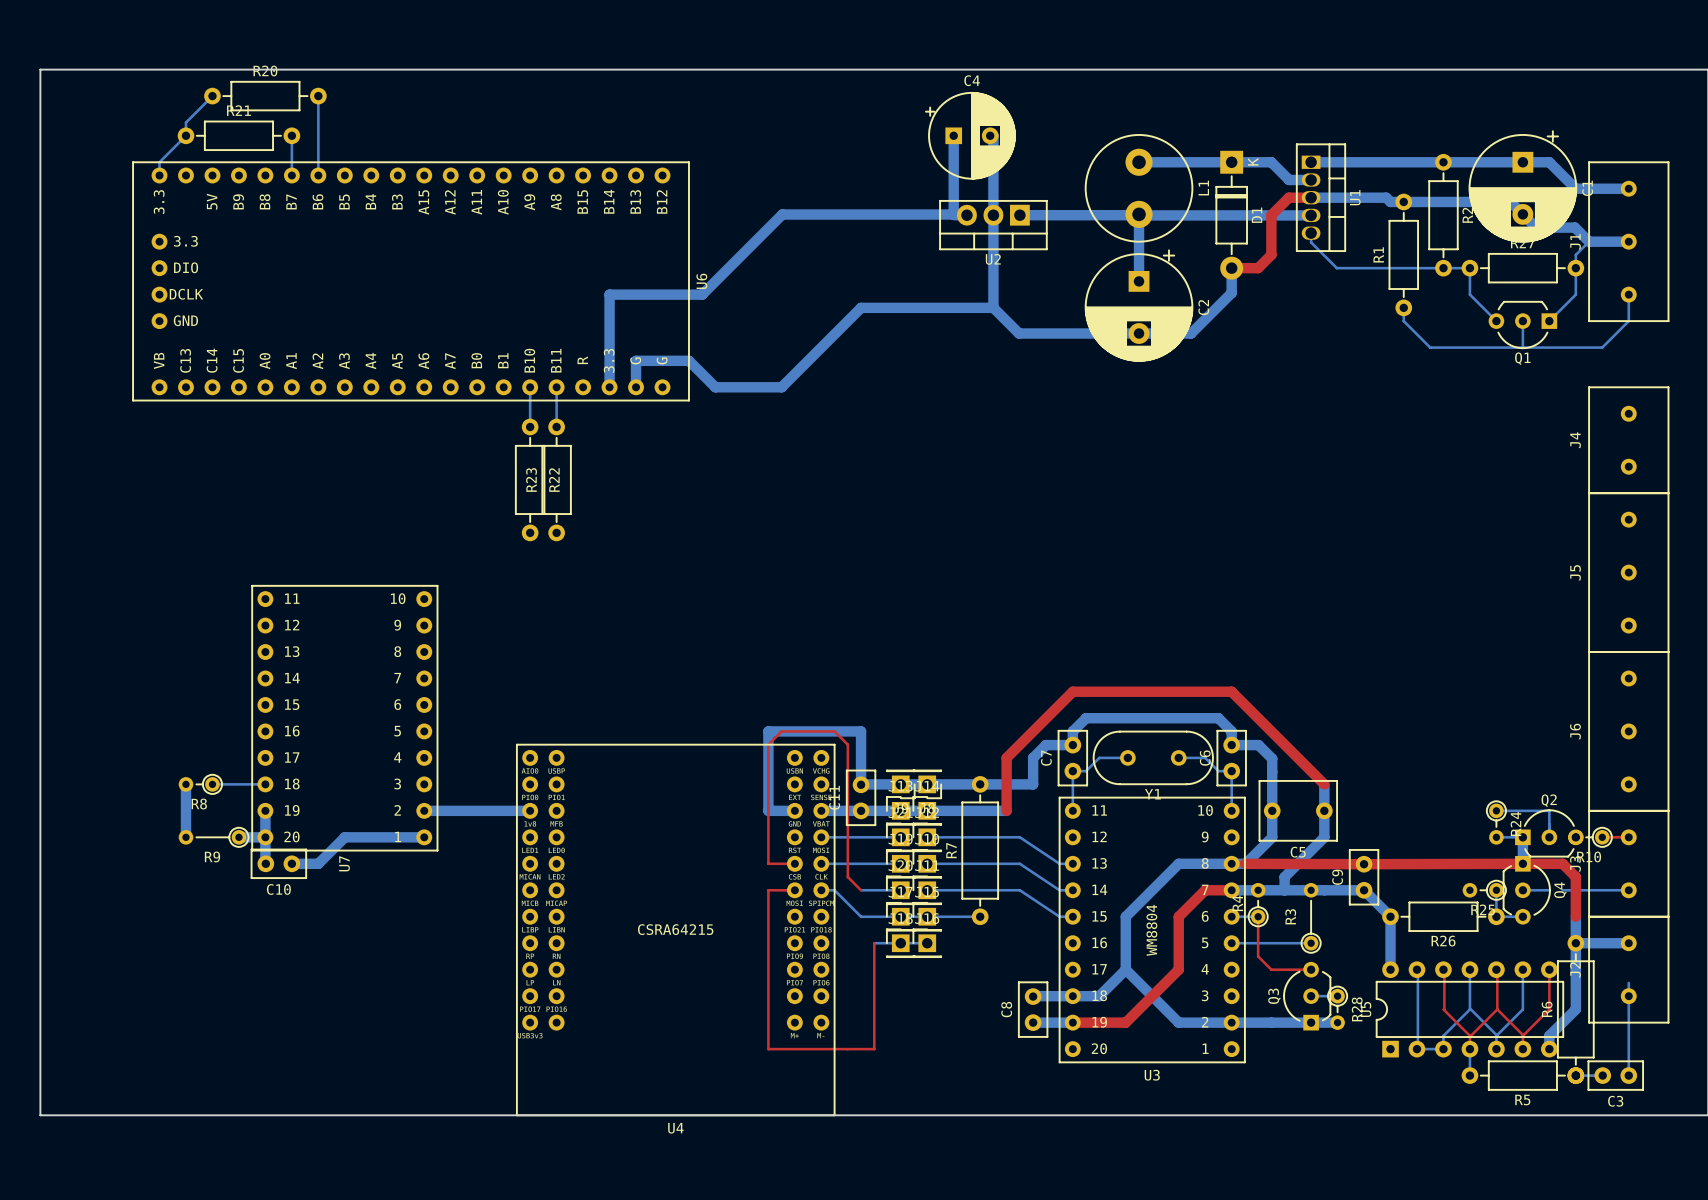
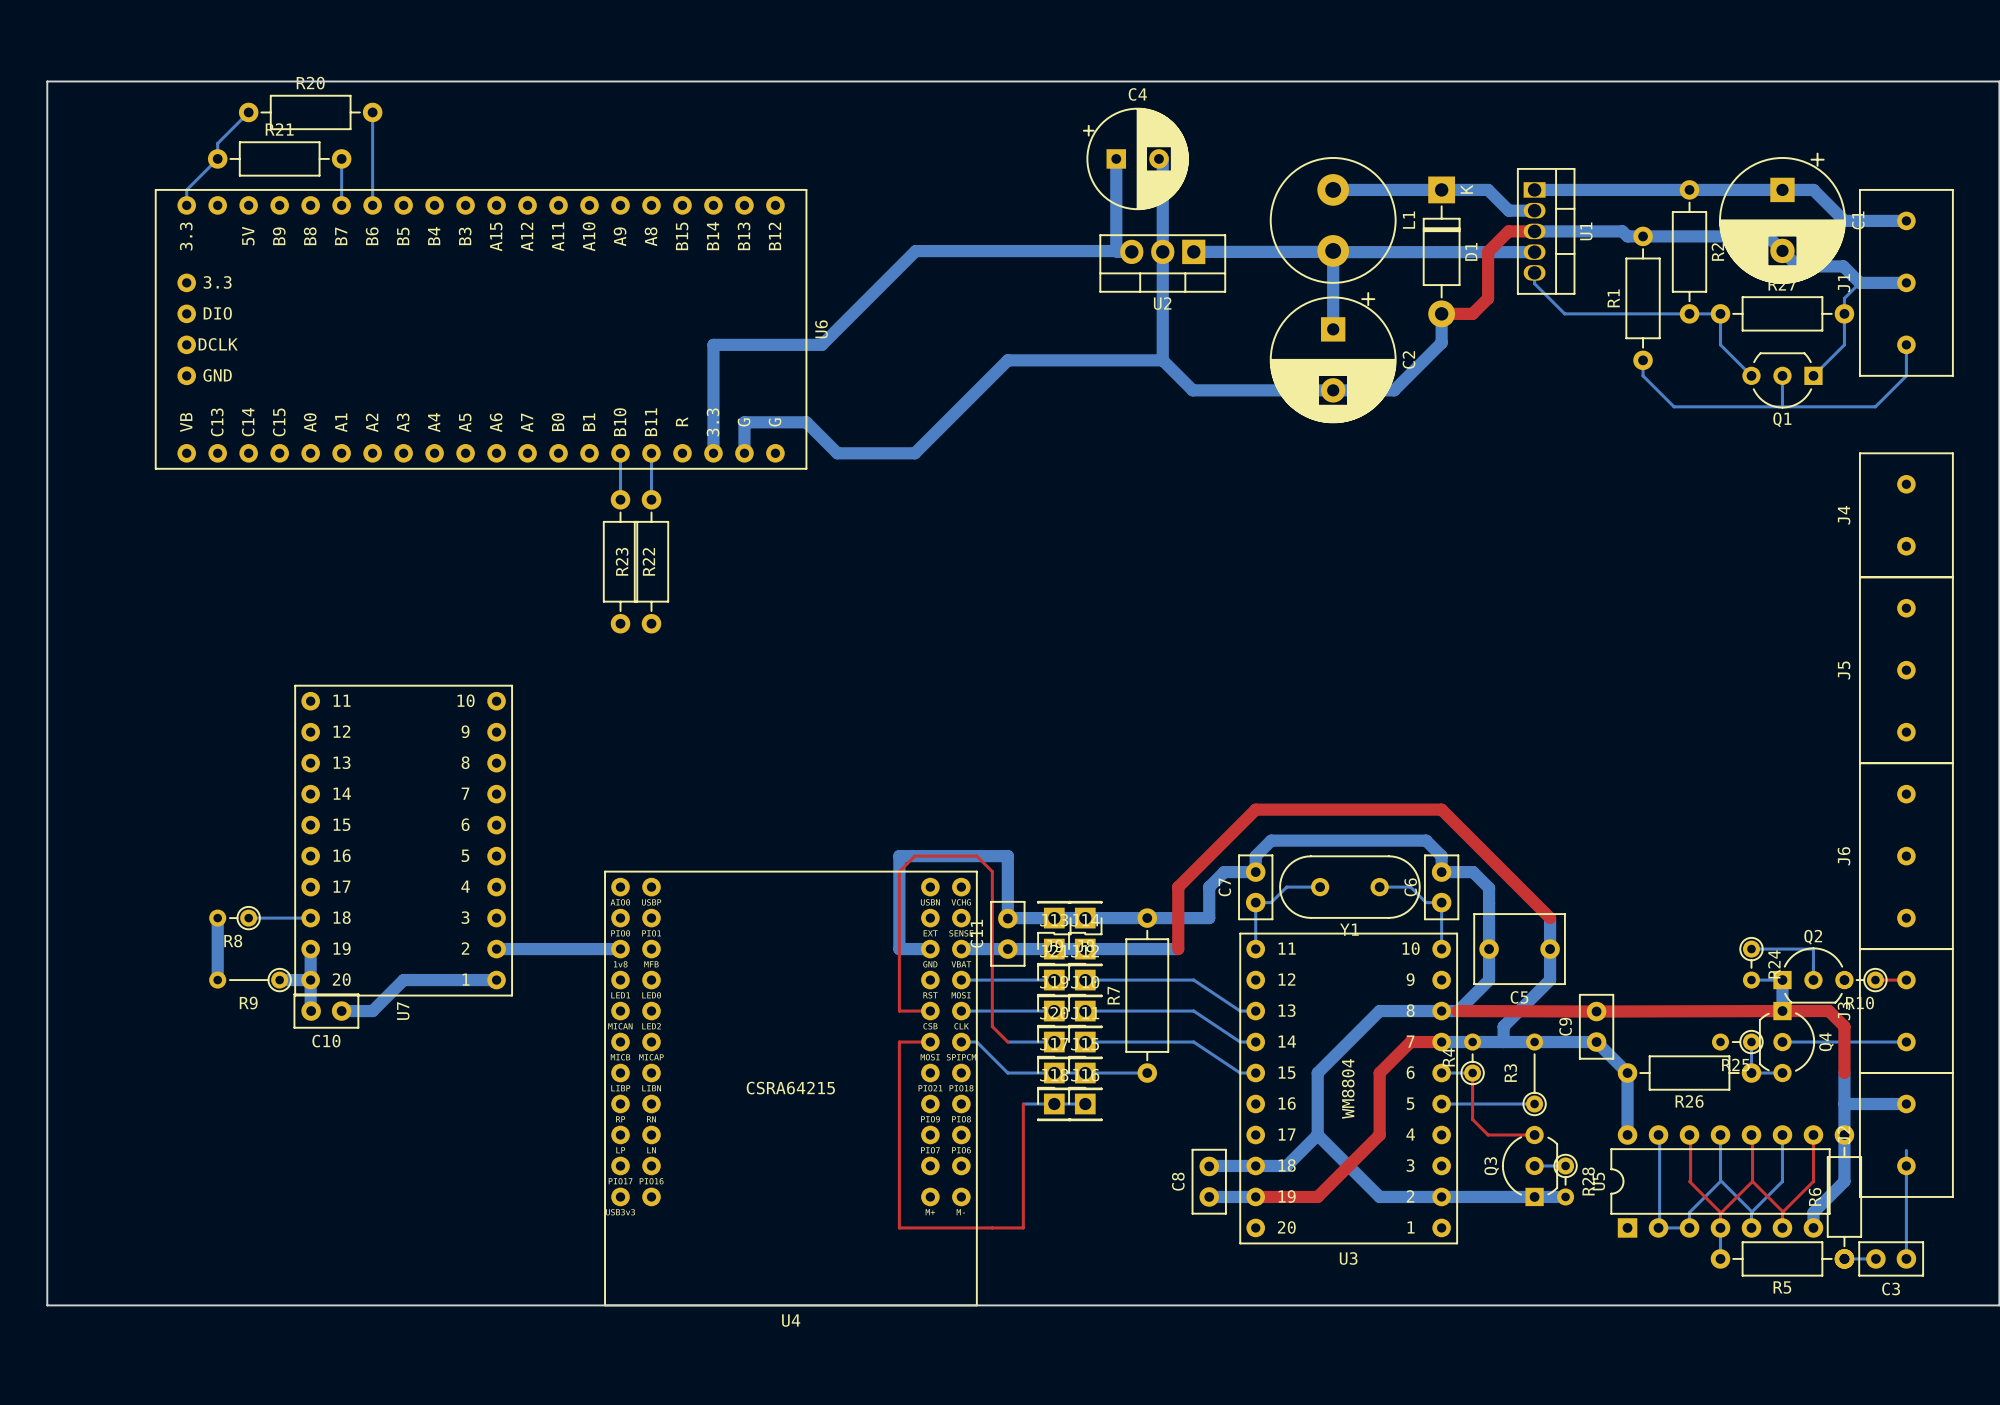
bottom track: none -> (1813, 1042) (1828, 1042)
R6 footprint: [1557, 934, 1595, 1084] -> [1827, 1125, 1862, 1269]

